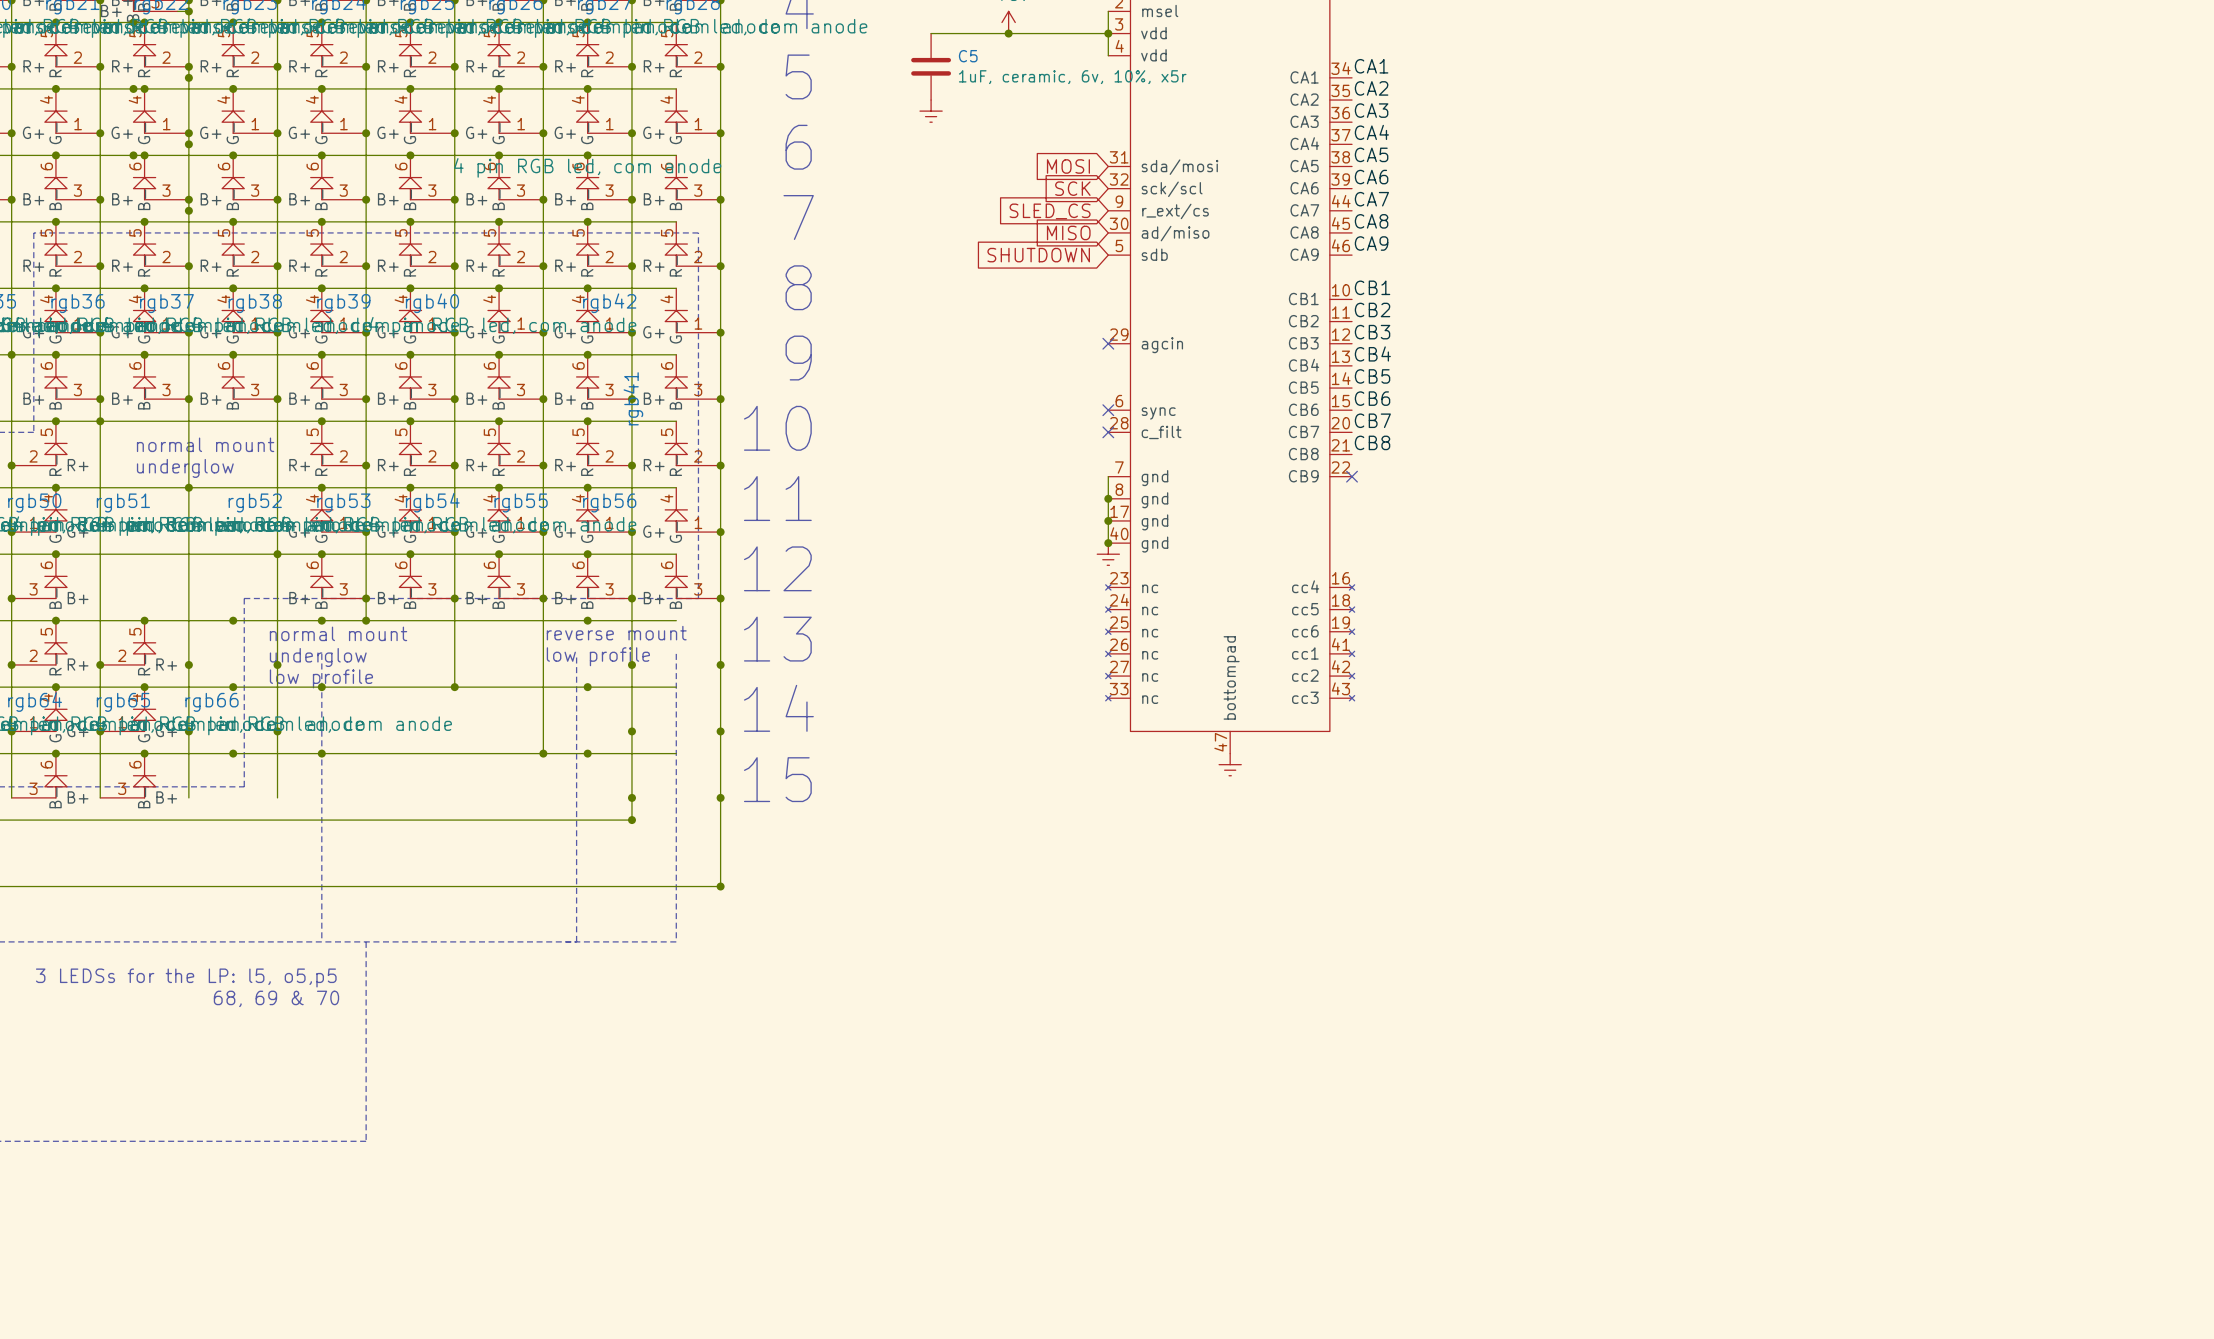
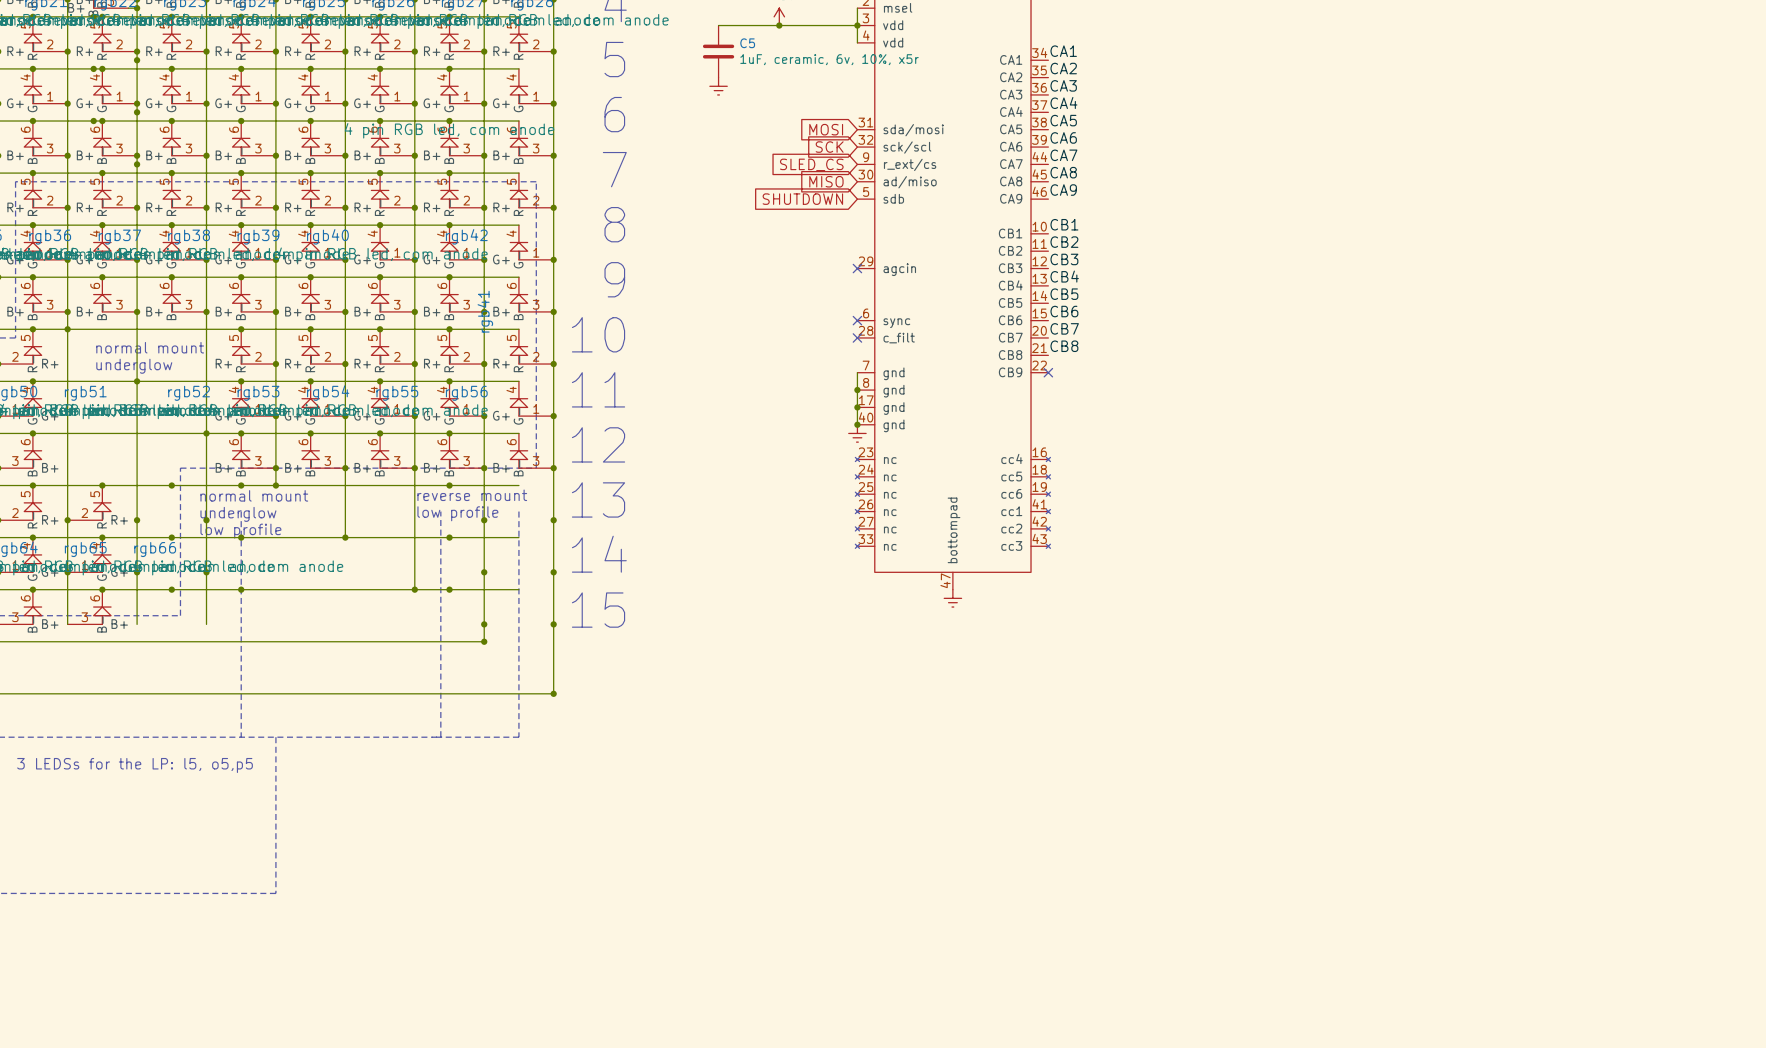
text: 68, 69 & 70 (276, 998) -> none

